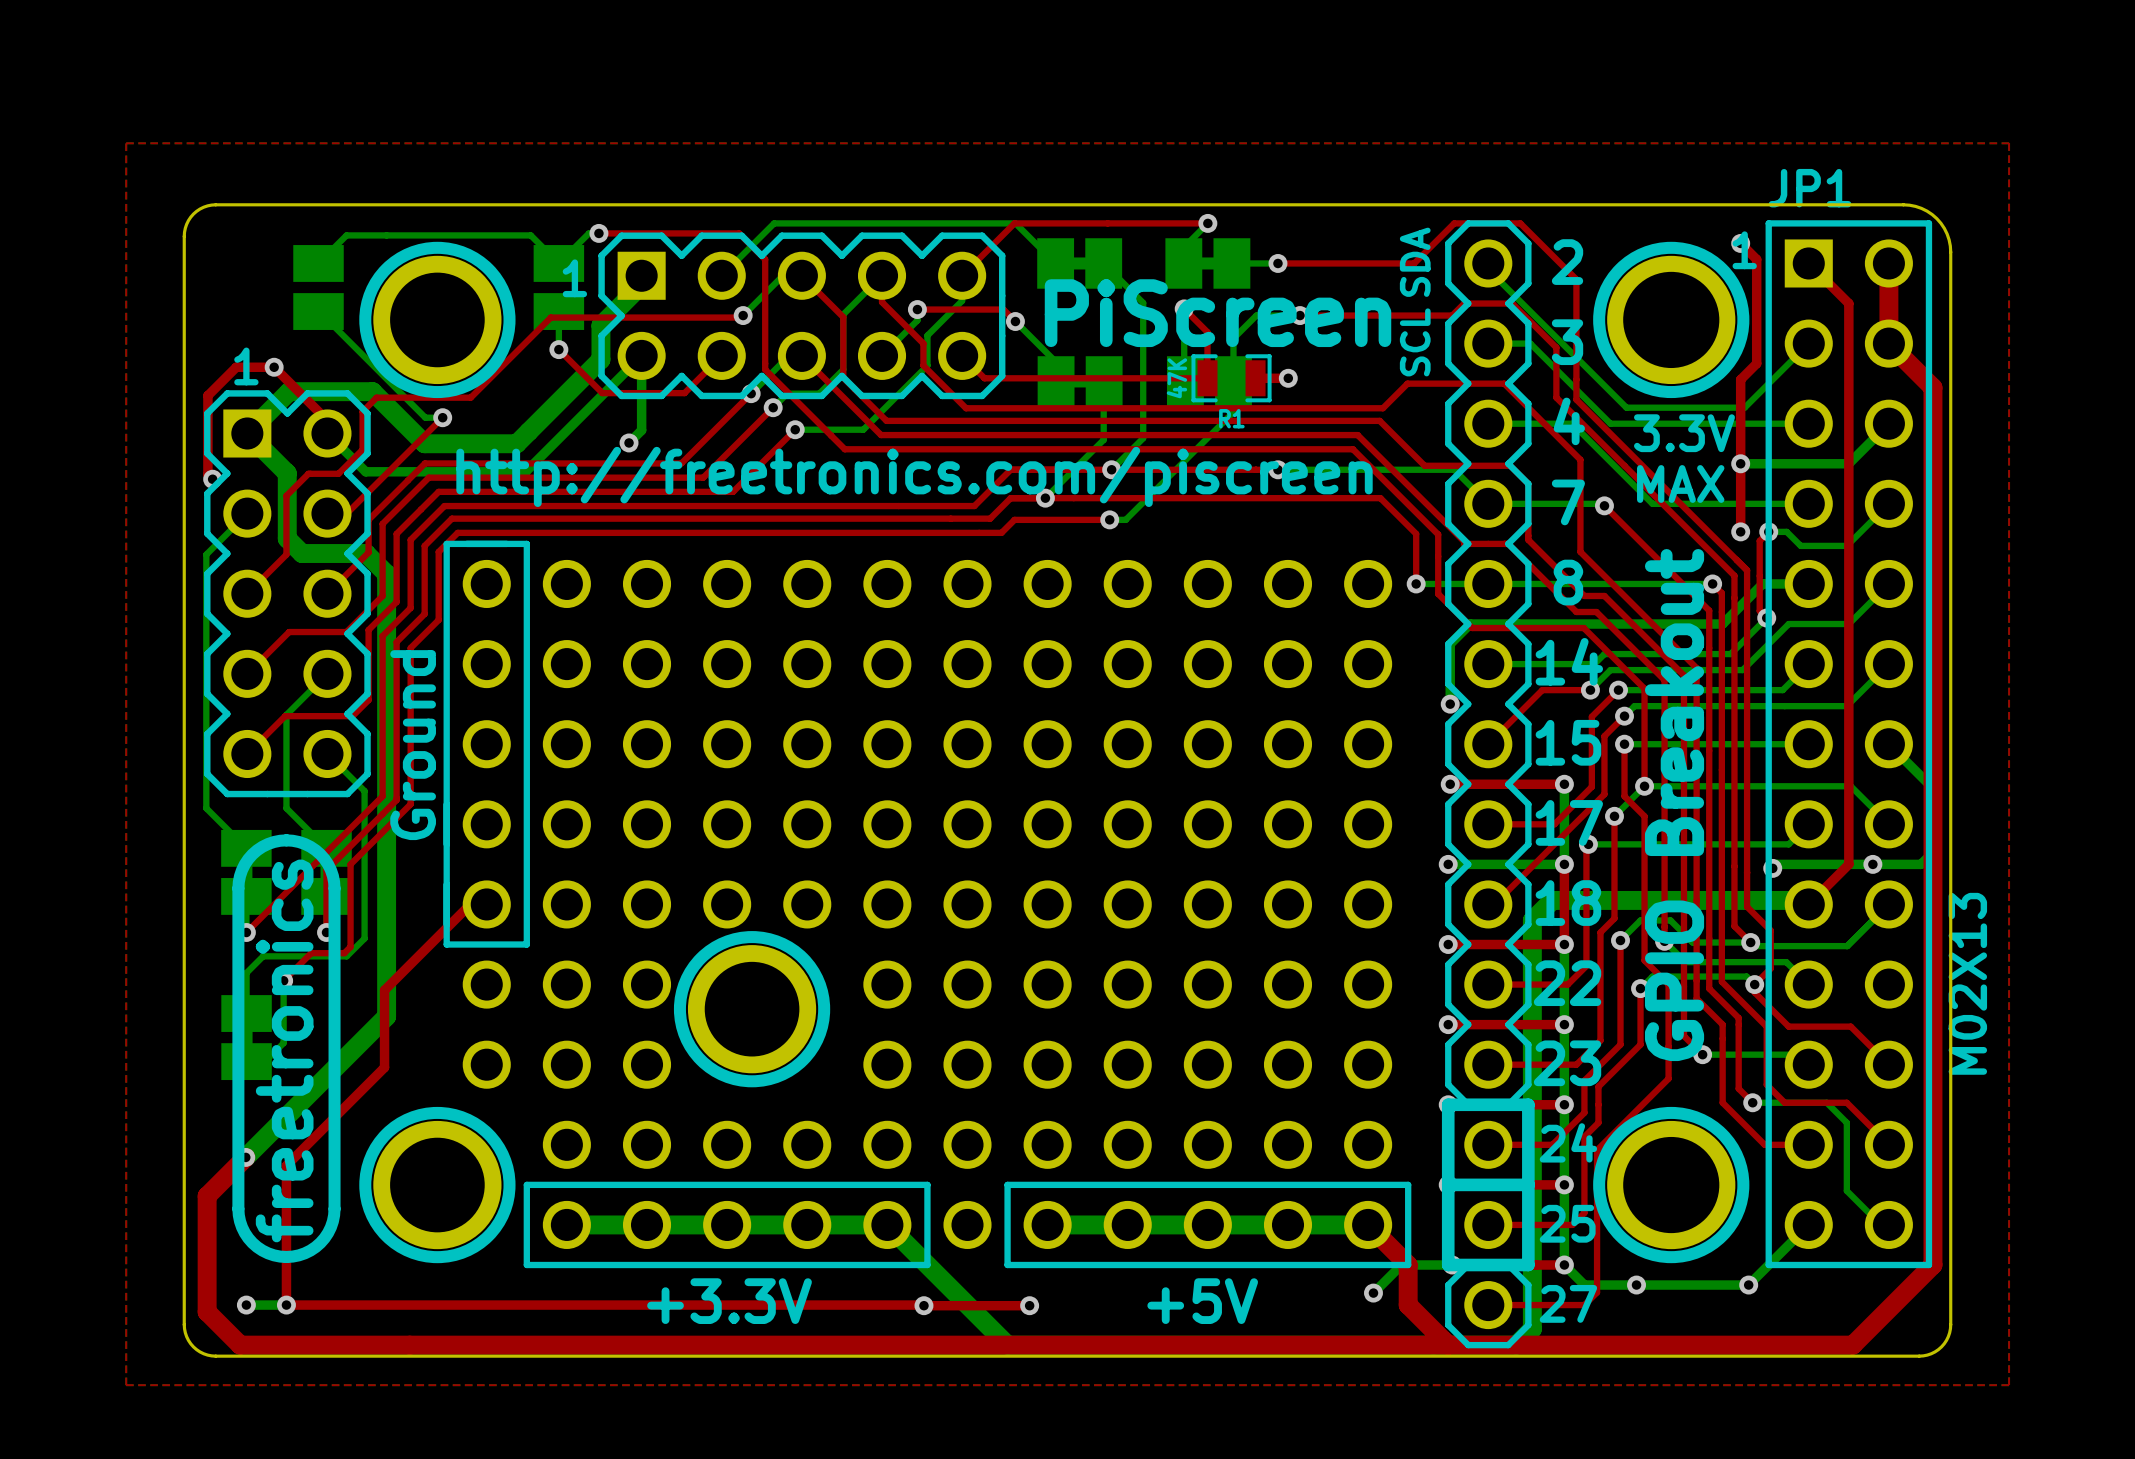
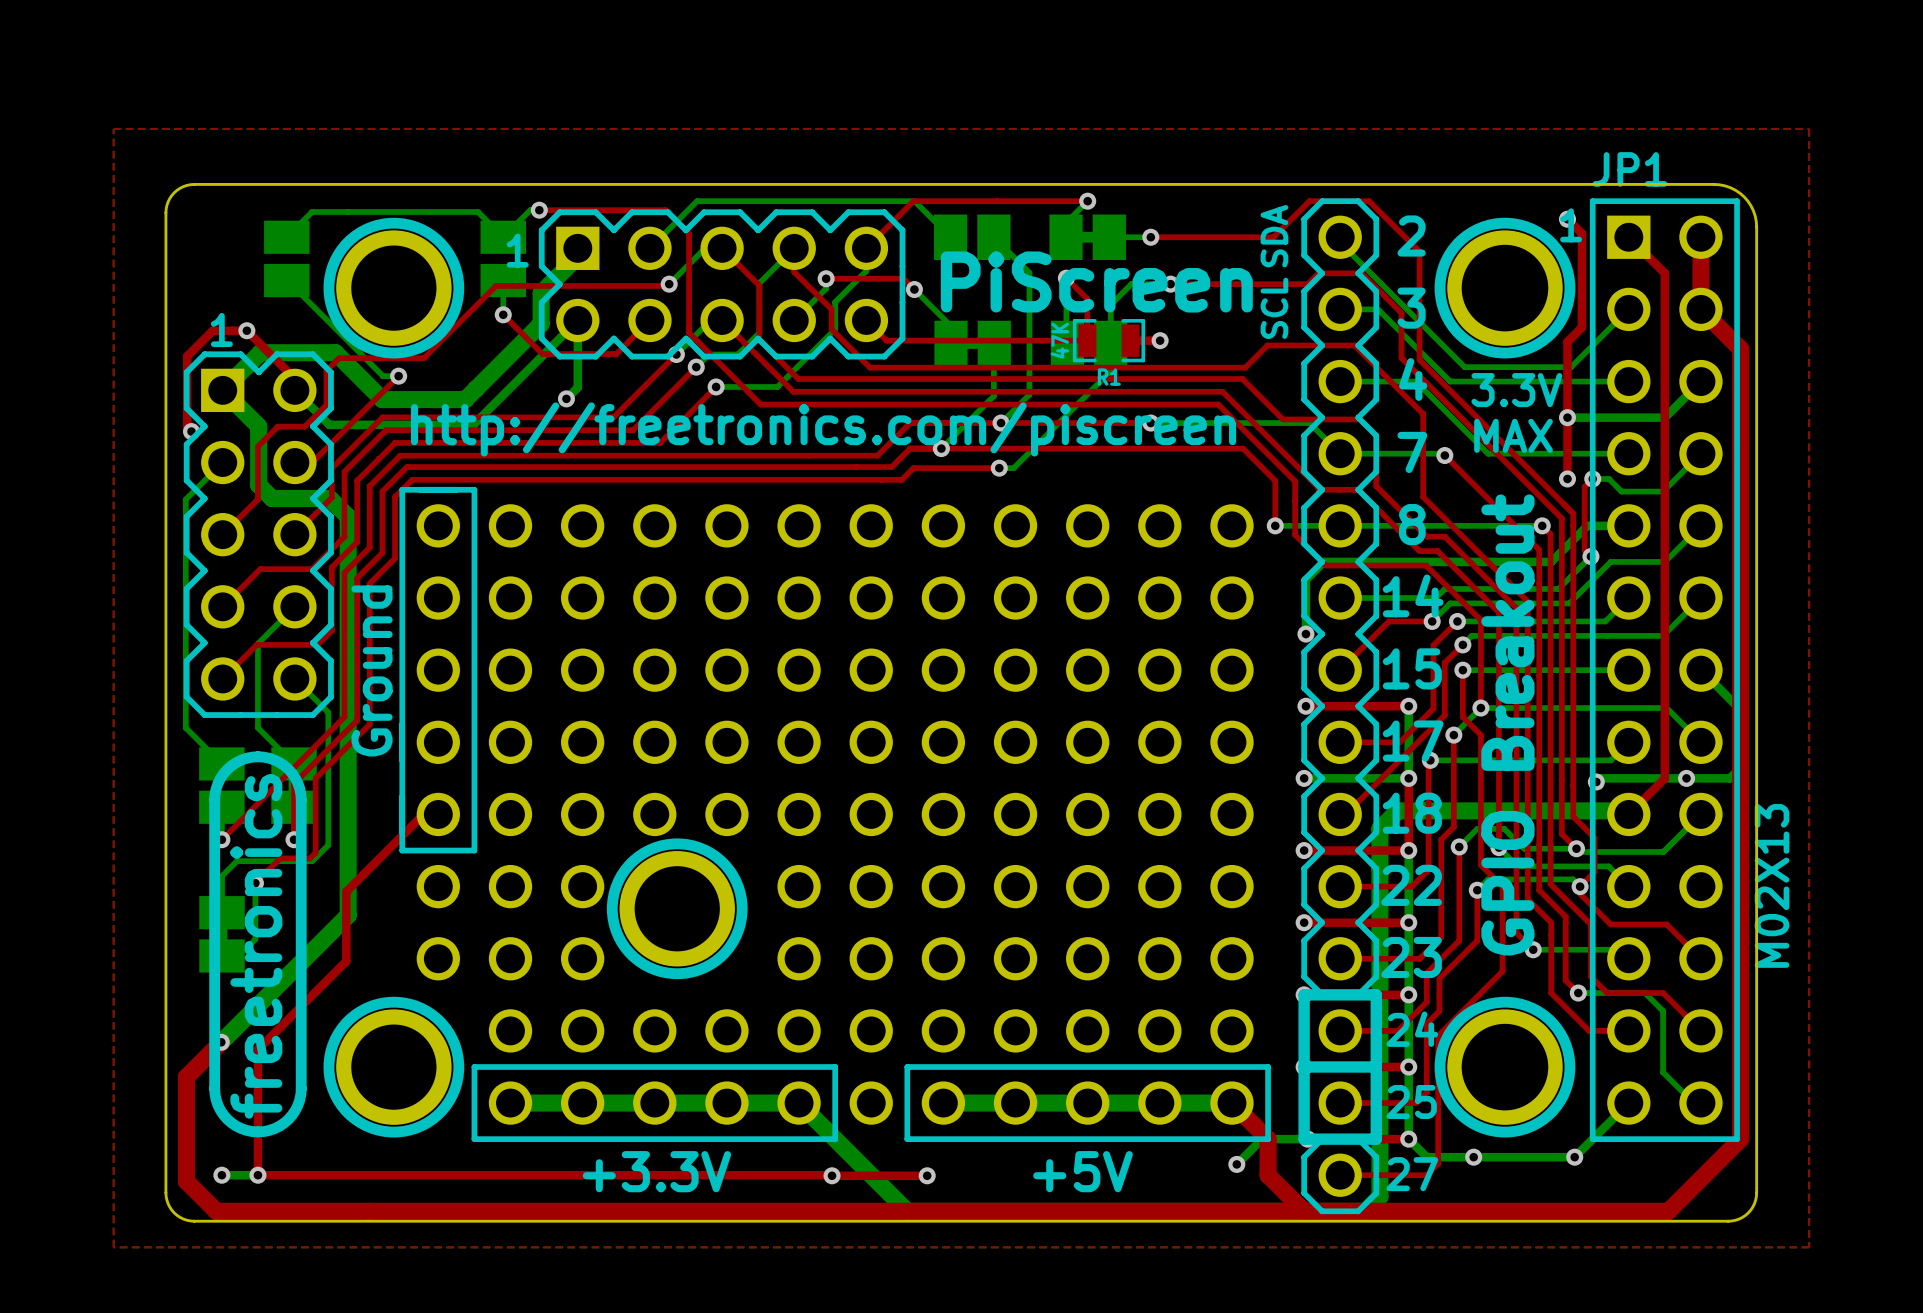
part footprint: [1037, 238, 1123, 289] -> [934, 214, 1011, 260]
part footprint: [221, 829, 272, 915] -> [199, 747, 245, 824]

